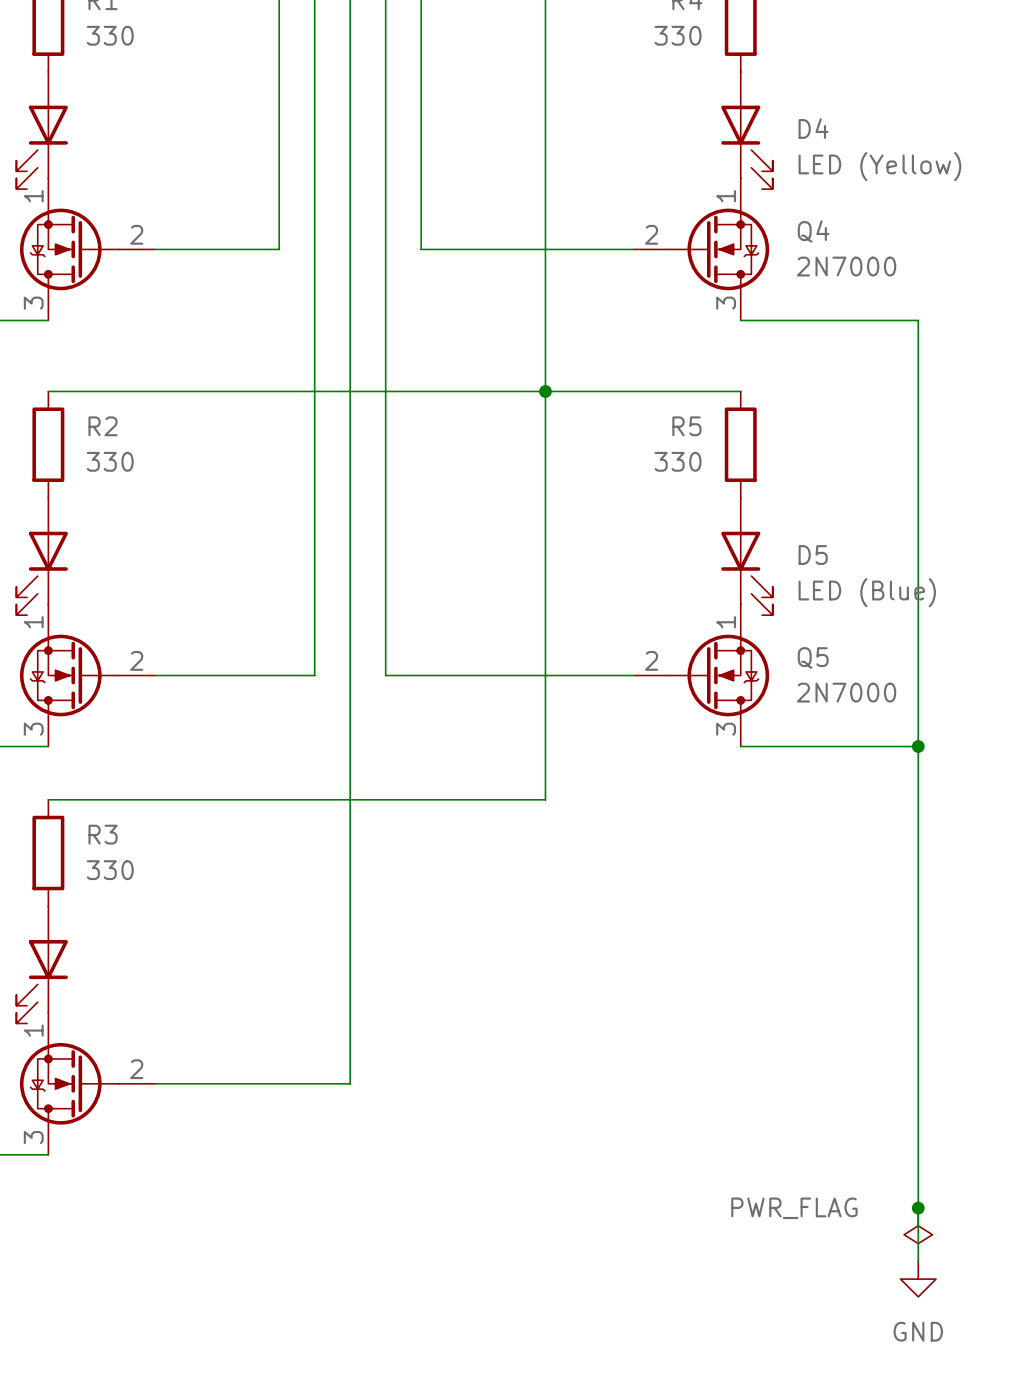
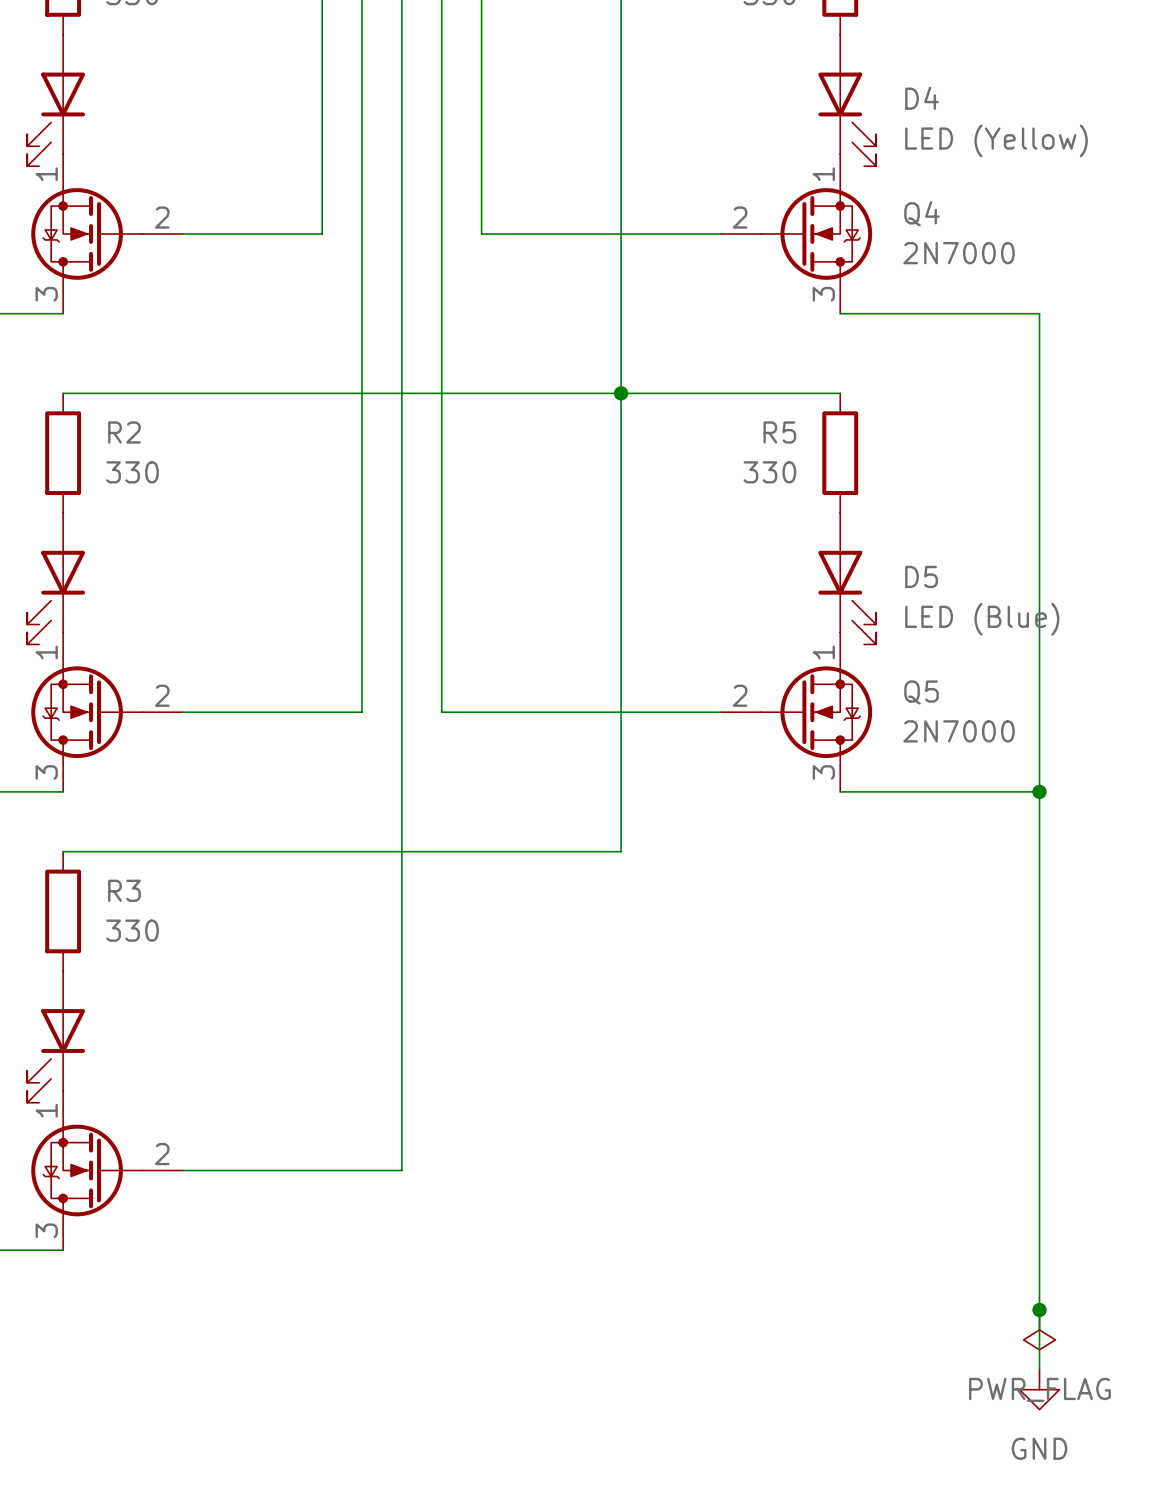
power symbol text position: PWR_FLAG (794, 1208) -> PWR_FLAG (1039, 1389)

